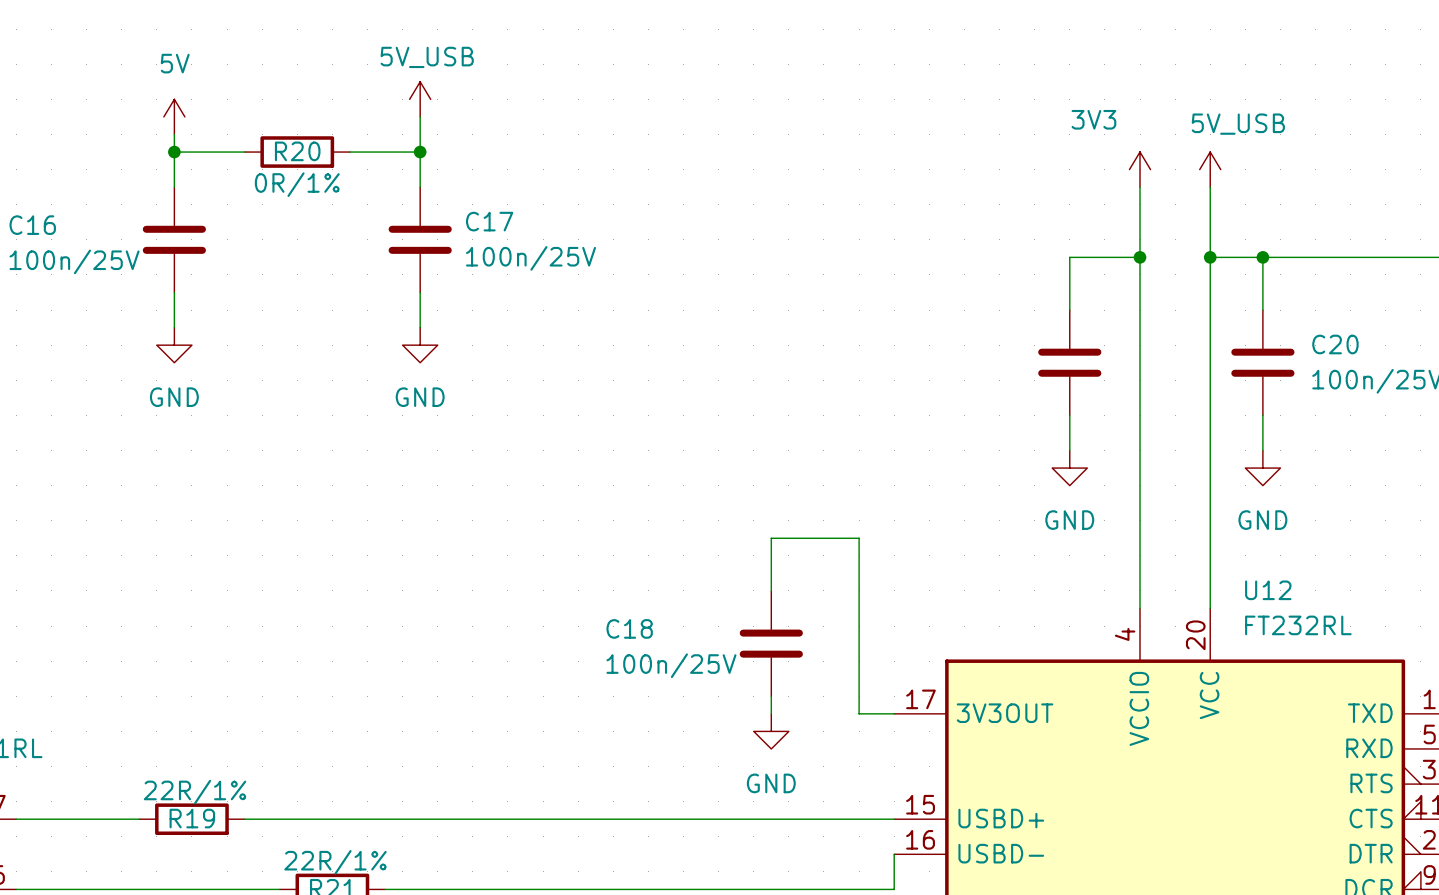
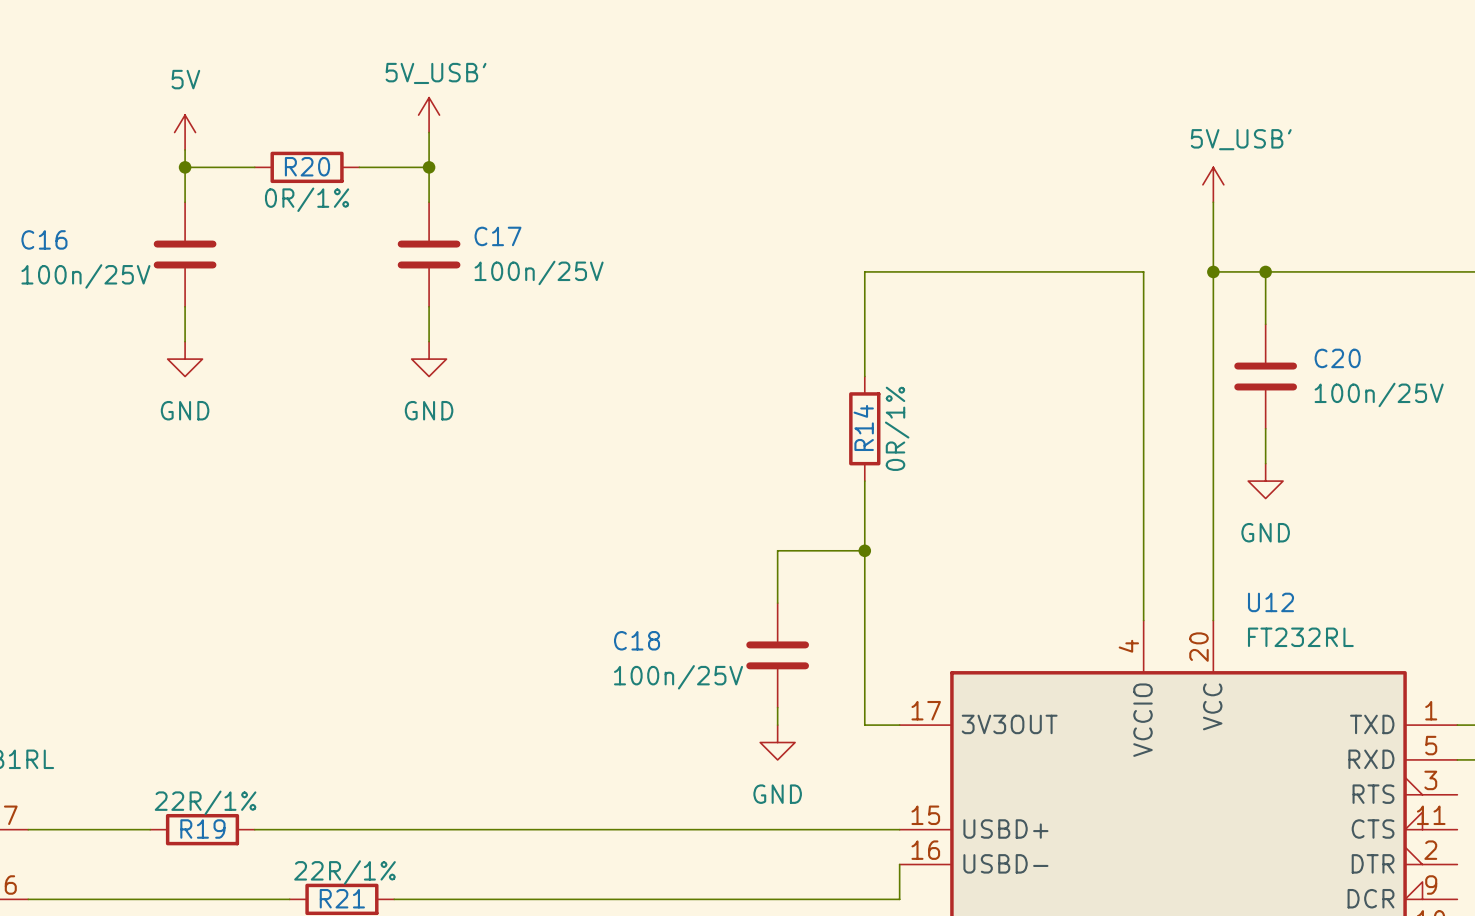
power symbol: 5V_USB (420, 99) -> 5V_USB' (429, 115)
power symbol: 3V3 (1140, 169) -> none
power symbol: 5V_USB (1210, 169) -> 5V_USB' (1213, 184)
wire: (1140, 187) (1140, 257) -> none
wire: (1069, 257) (1069, 310) -> (1073, 271) (864, 271) (864, 376)
junction: (1140, 257) -> none
part: (1069, 362) -> none
R14: none -> 0R/1% (864, 428)
wire: (1069, 415) (1069, 450) -> none
wire: none -> (864, 481) (864, 550)
power symbol: GND (1069, 468) -> none
junction: none -> (864, 550)

